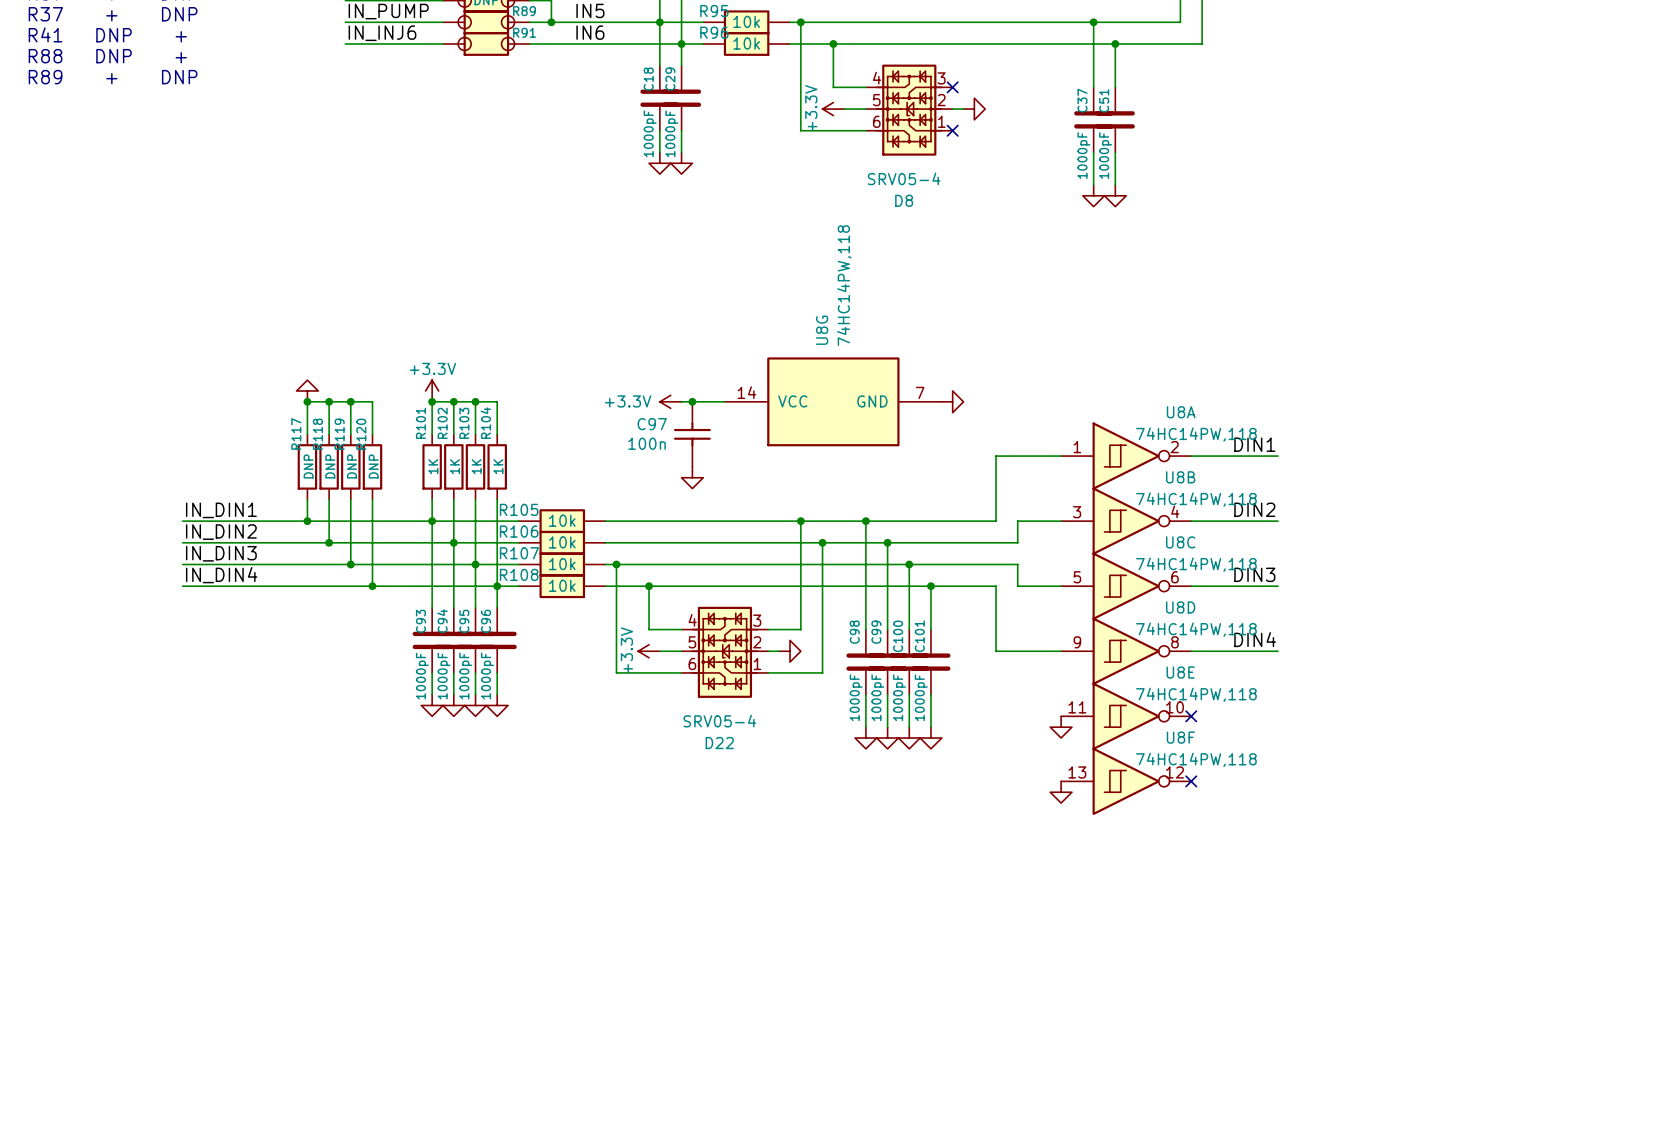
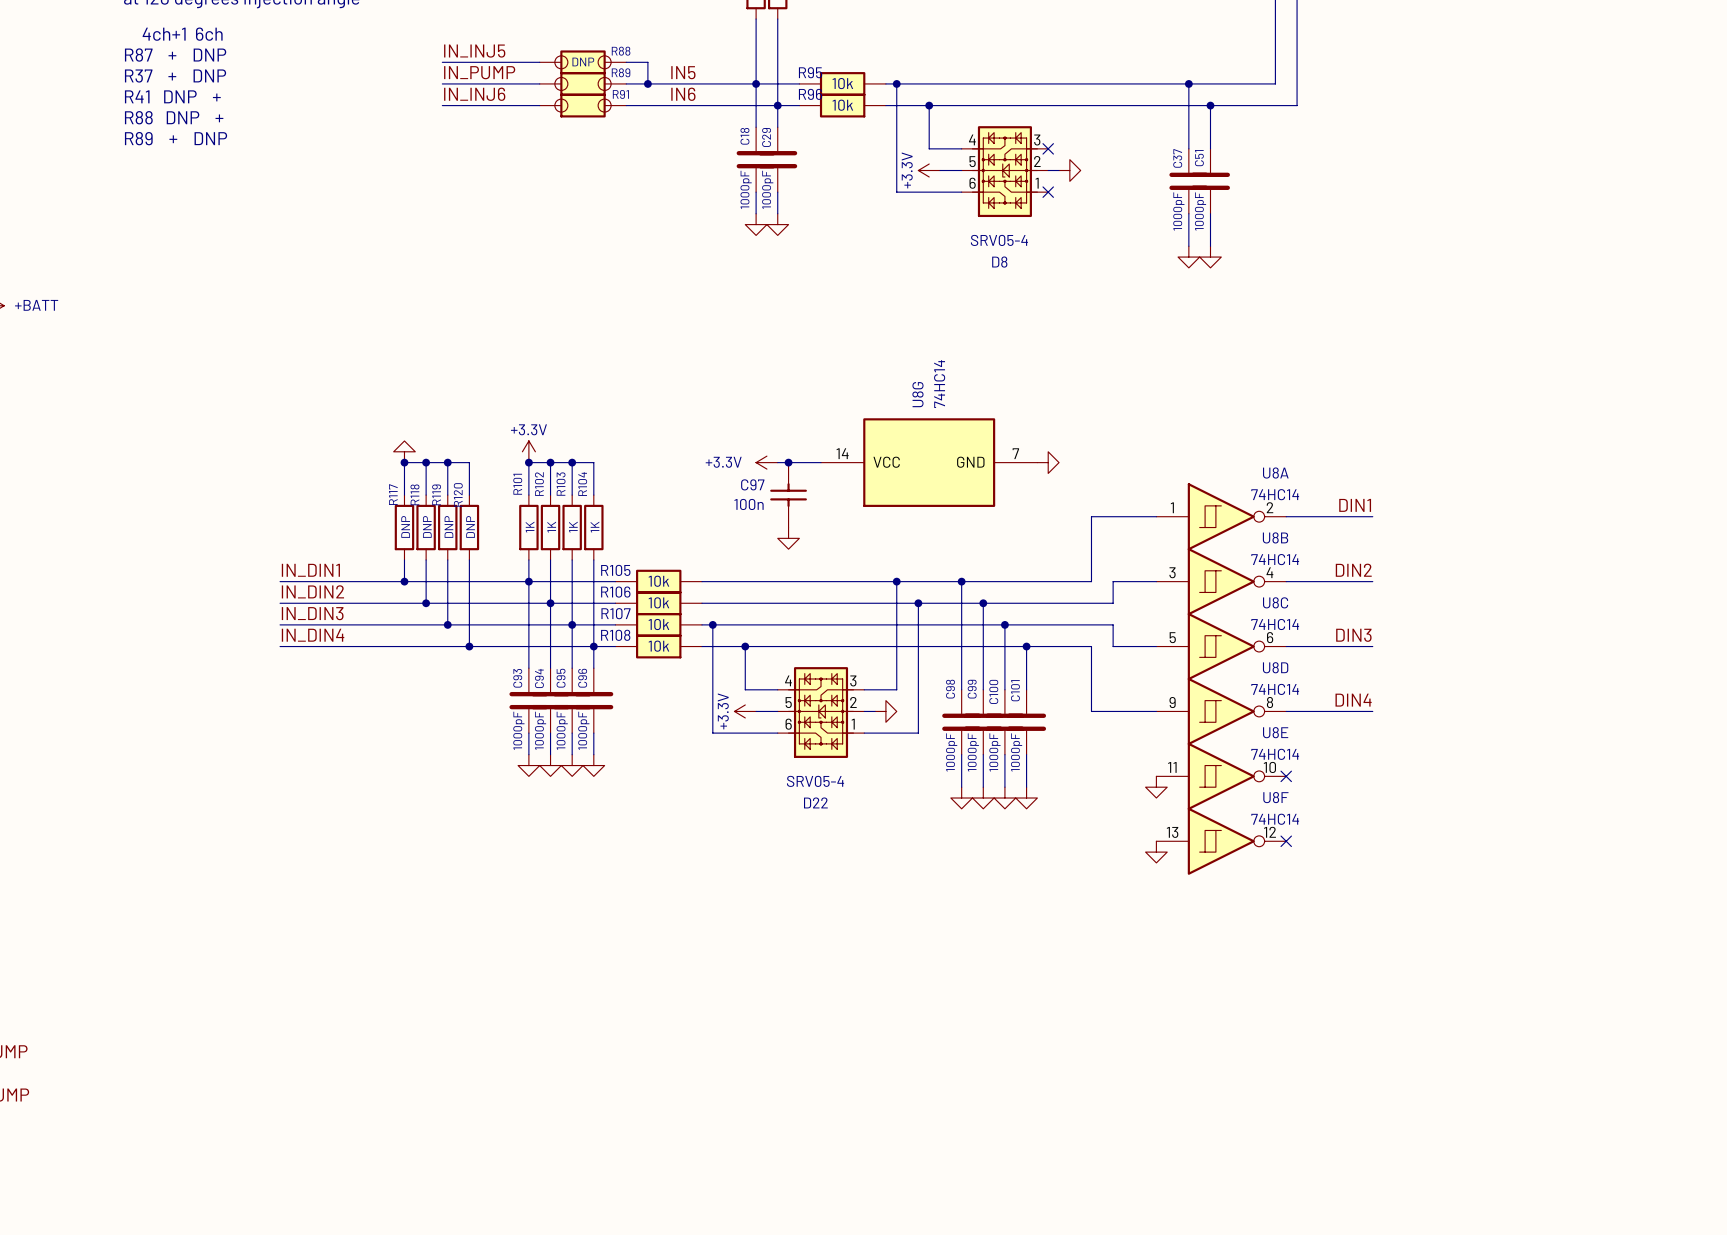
U8G value: 74HC14PW,118 (844, 285) -> 74HC14 (939, 384)
U8A value: 74HC14PW,118 (1196, 434) -> 74HC14 (1275, 494)
U8B value: 74HC14PW,118 (1196, 499) -> 74HC14 (1275, 559)
U8C value: 74HC14PW,118 (1196, 564) -> 74HC14 (1275, 624)
U8D value: 74HC14PW,118 (1196, 629) -> 74HC14 (1275, 689)
U8E value: 74HC14PW,118 (1196, 694) -> 74HC14 (1275, 754)
U8F value: 74HC14PW,118 (1196, 759) -> 74HC14 (1275, 819)

